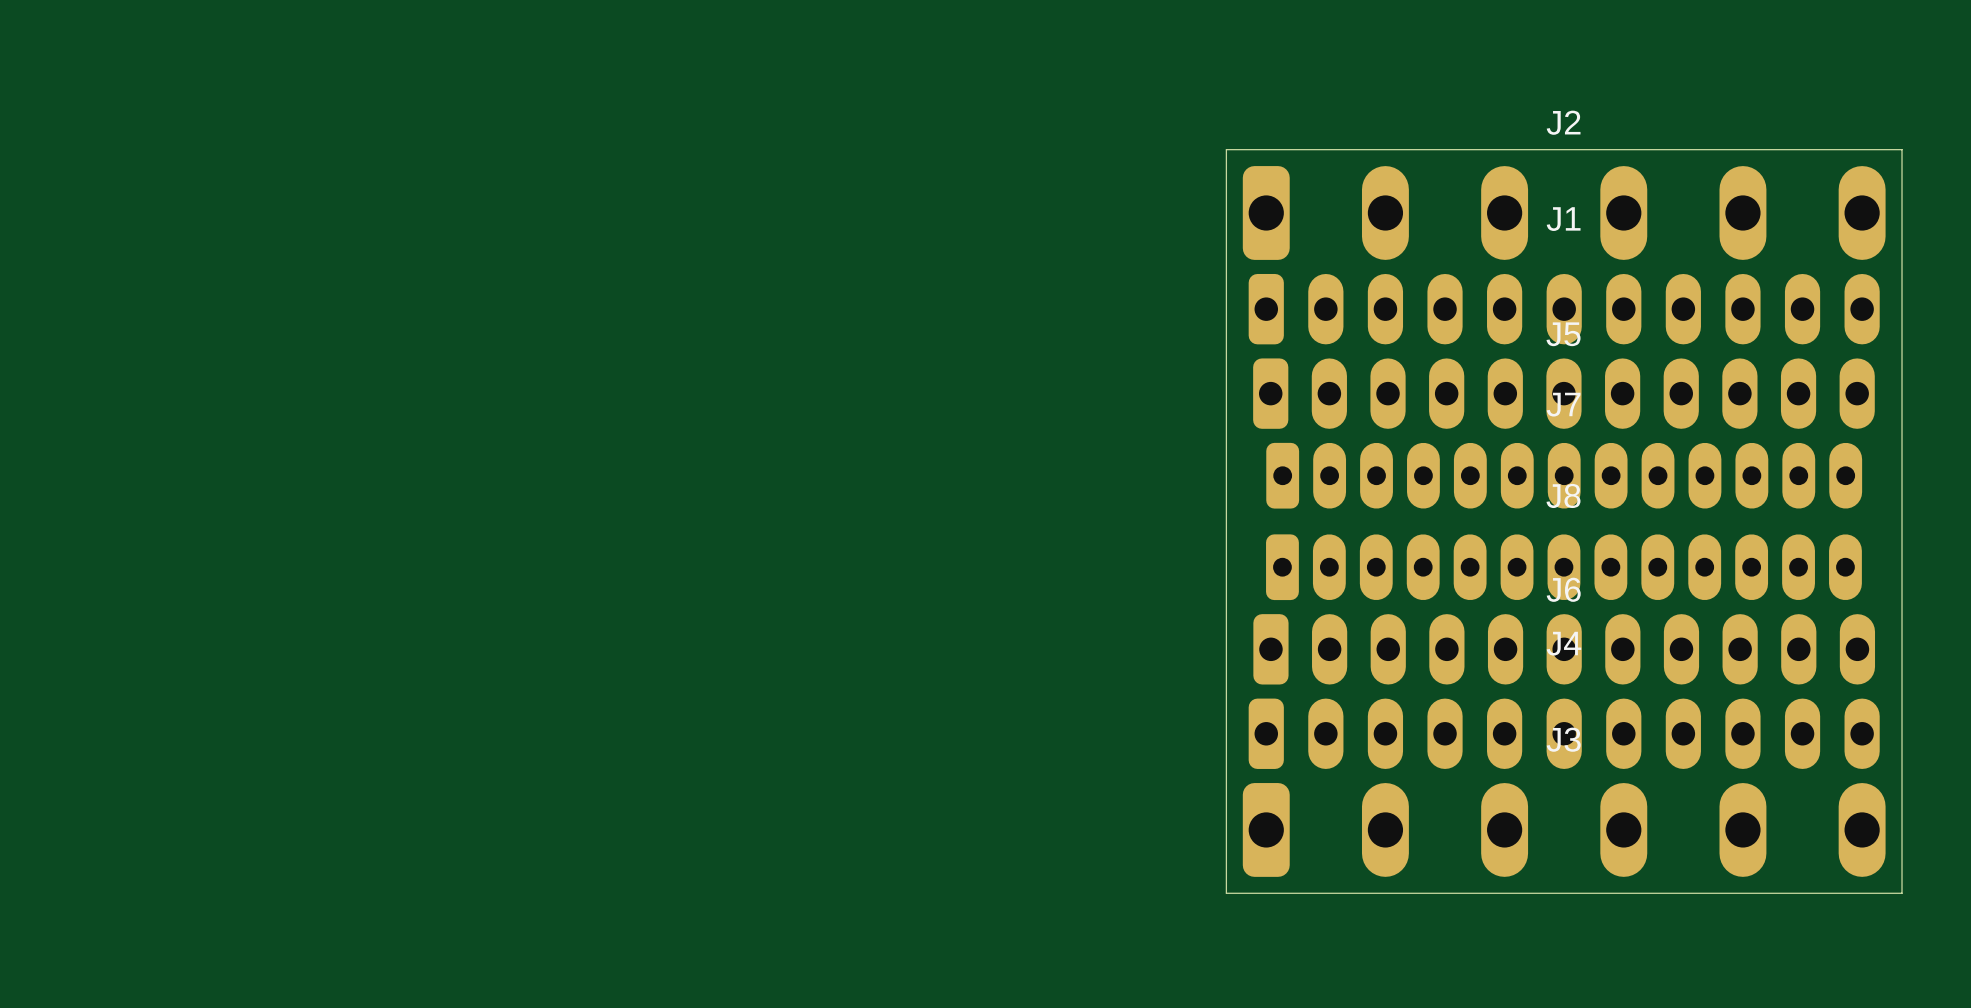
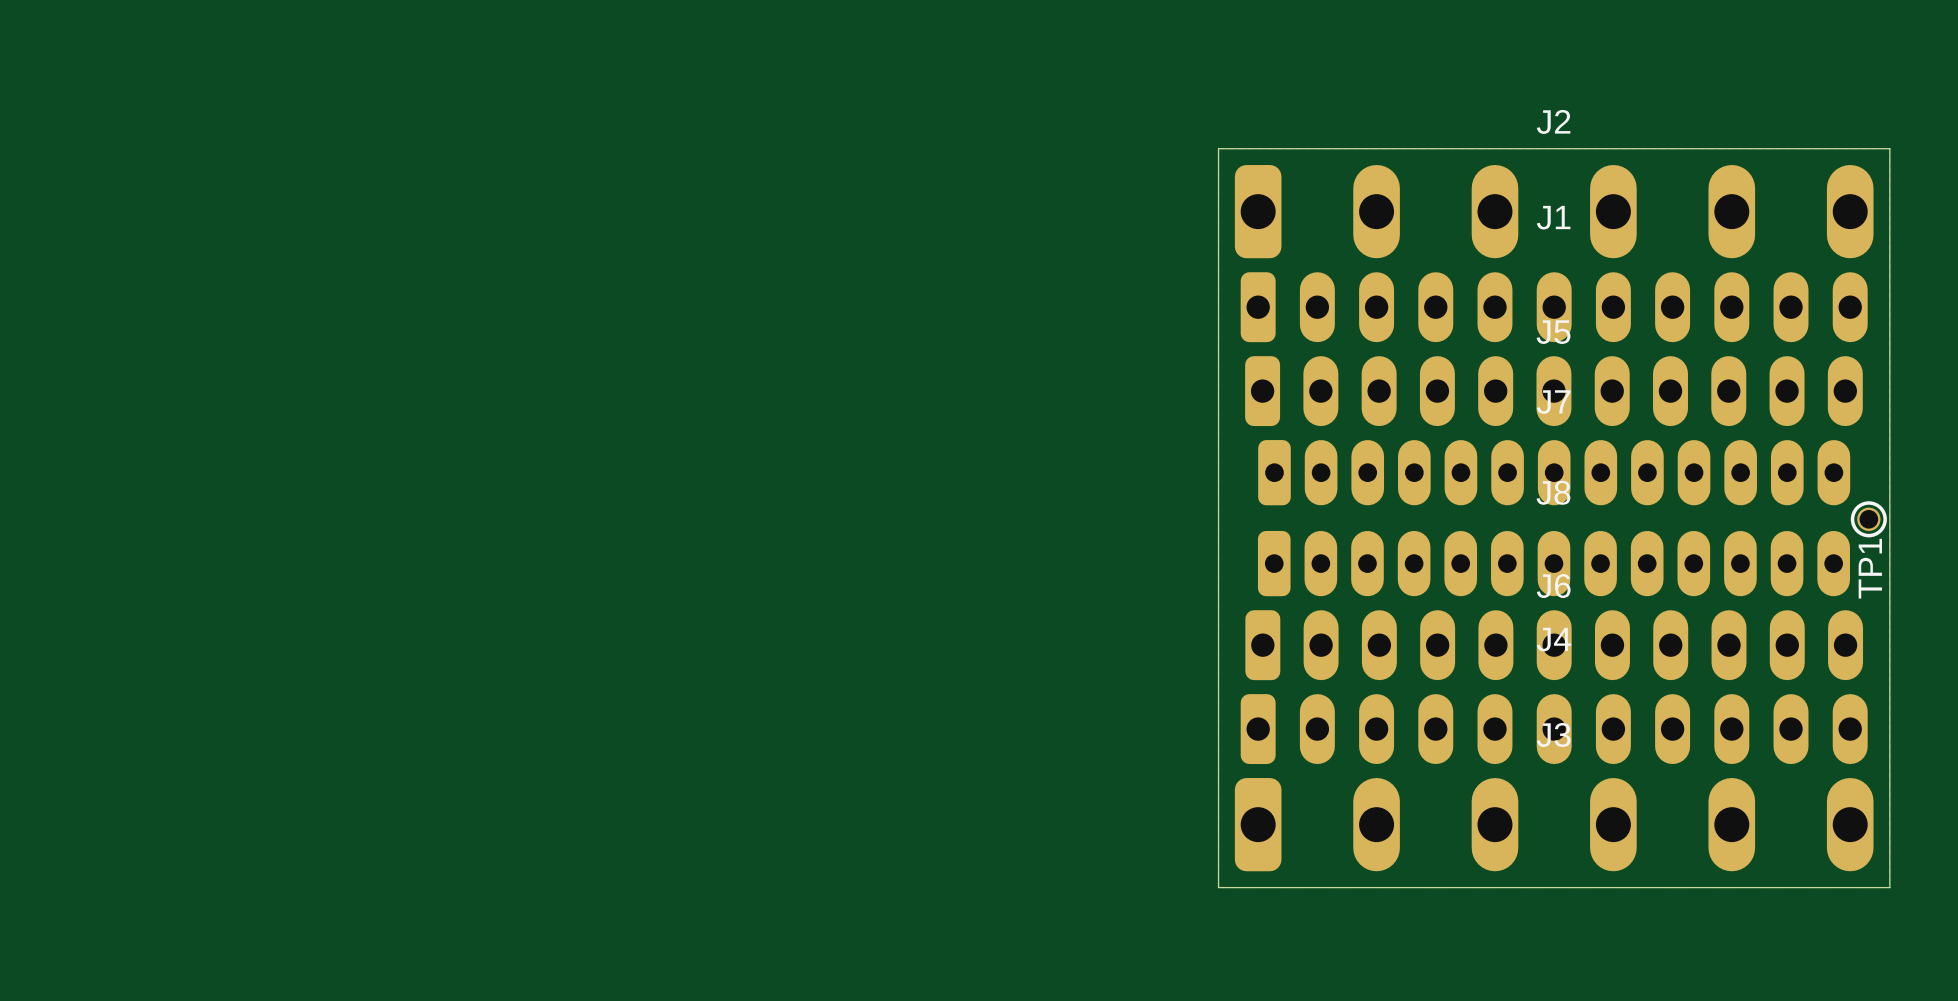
TP1: none -> (1868, 519)

